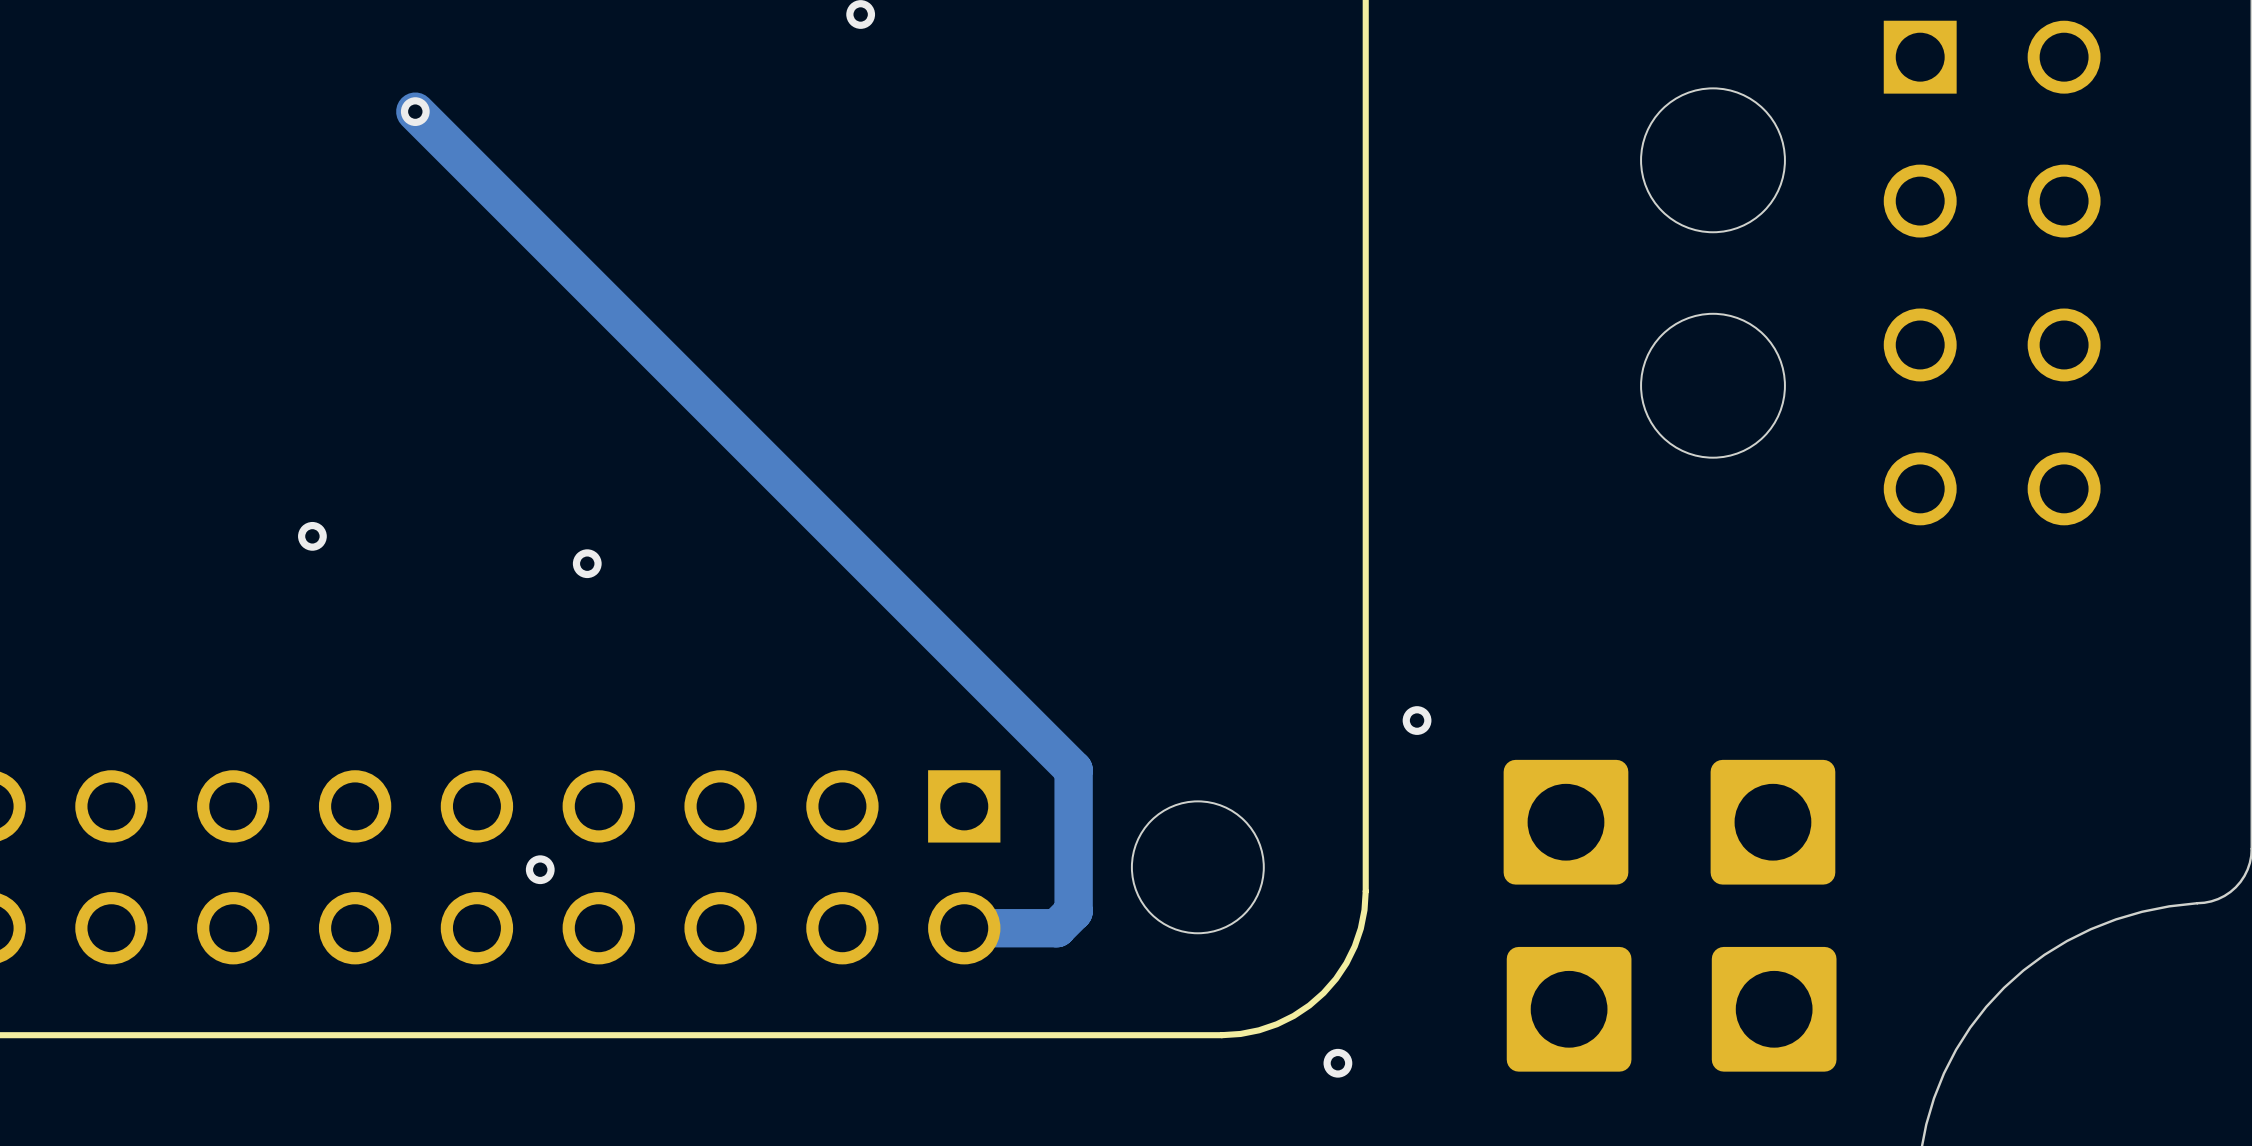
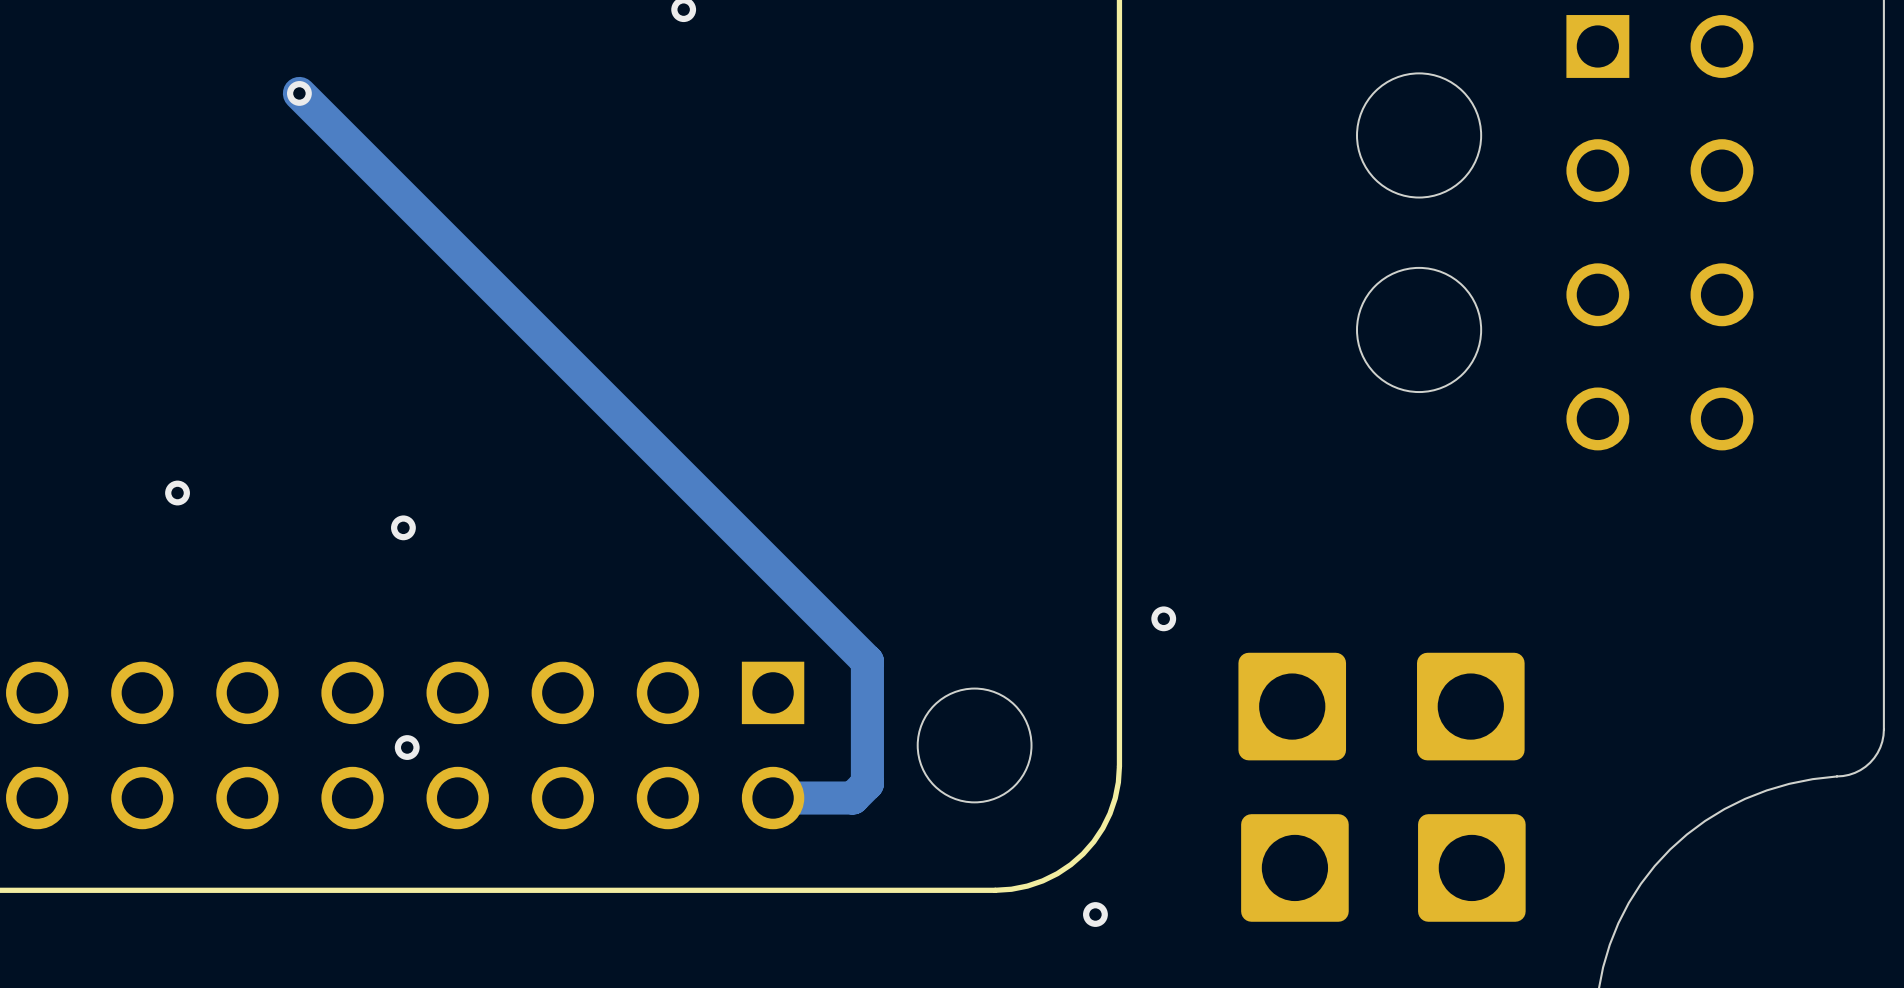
via position: (312, 536) -> (177, 493)
via position: (587, 563) -> (403, 527)

